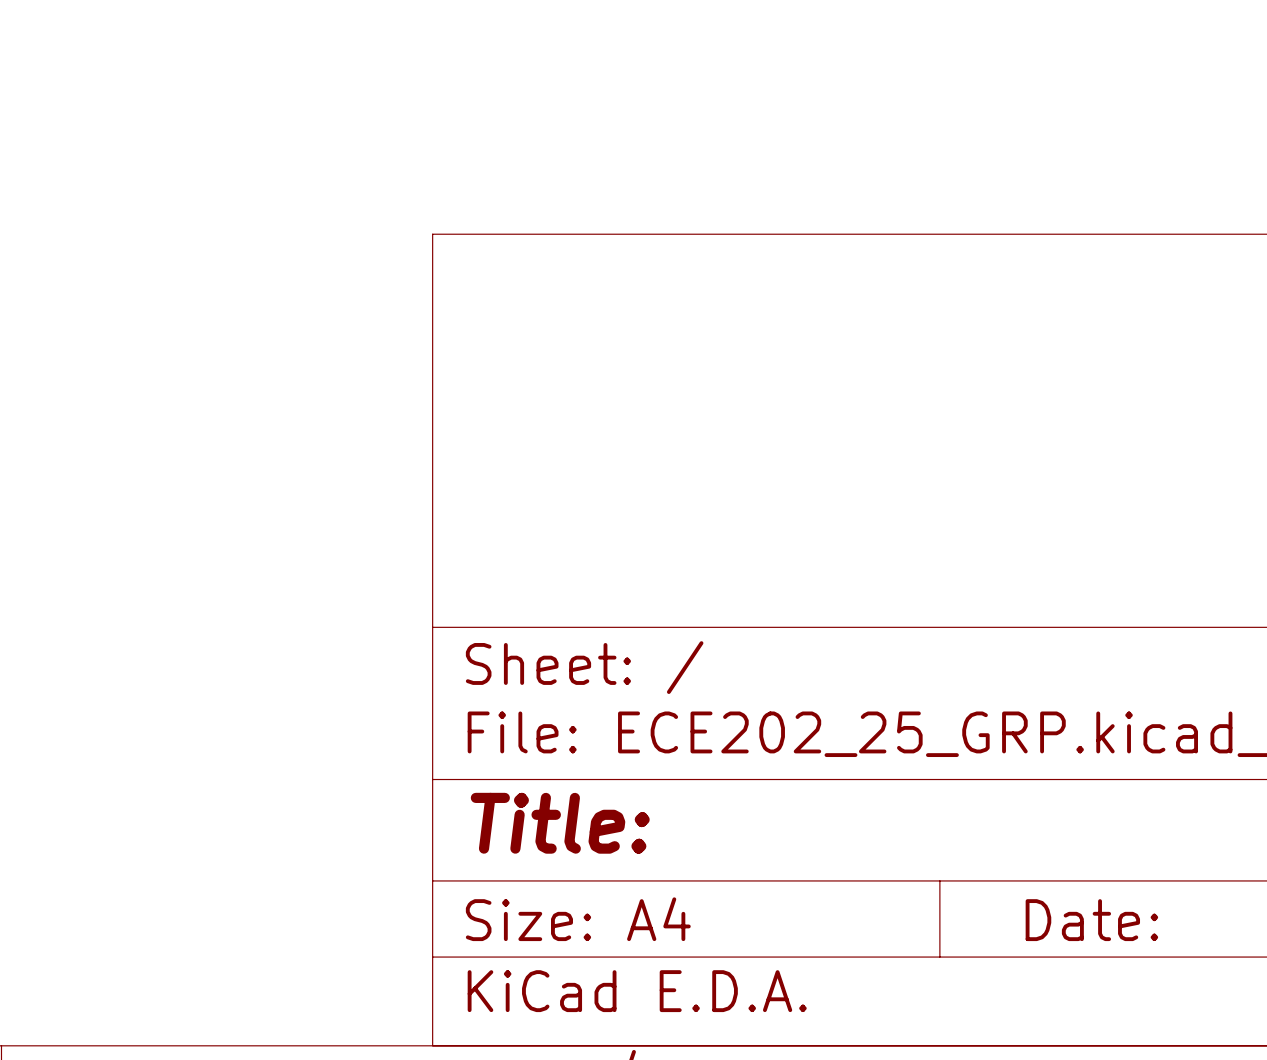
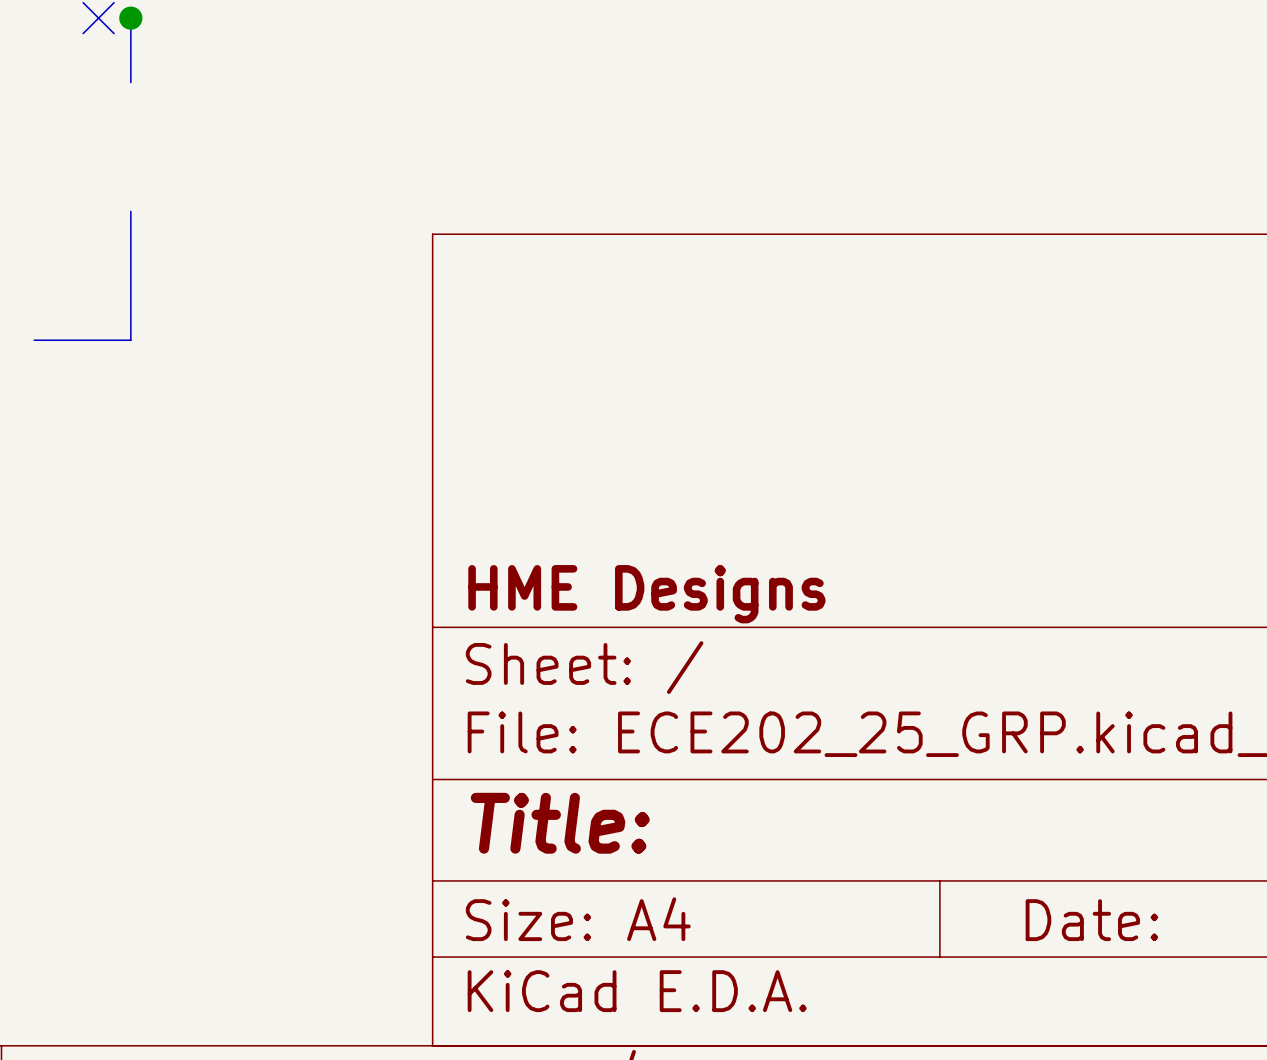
no-connect mark: none -> (98, 18)
bus: none -> (130, 18) (130, 82)
junction: none -> (130, 18)
bus: none -> (130, 211) (130, 340) (34, 340)
title block: none -> HME Designs (646, 594)

